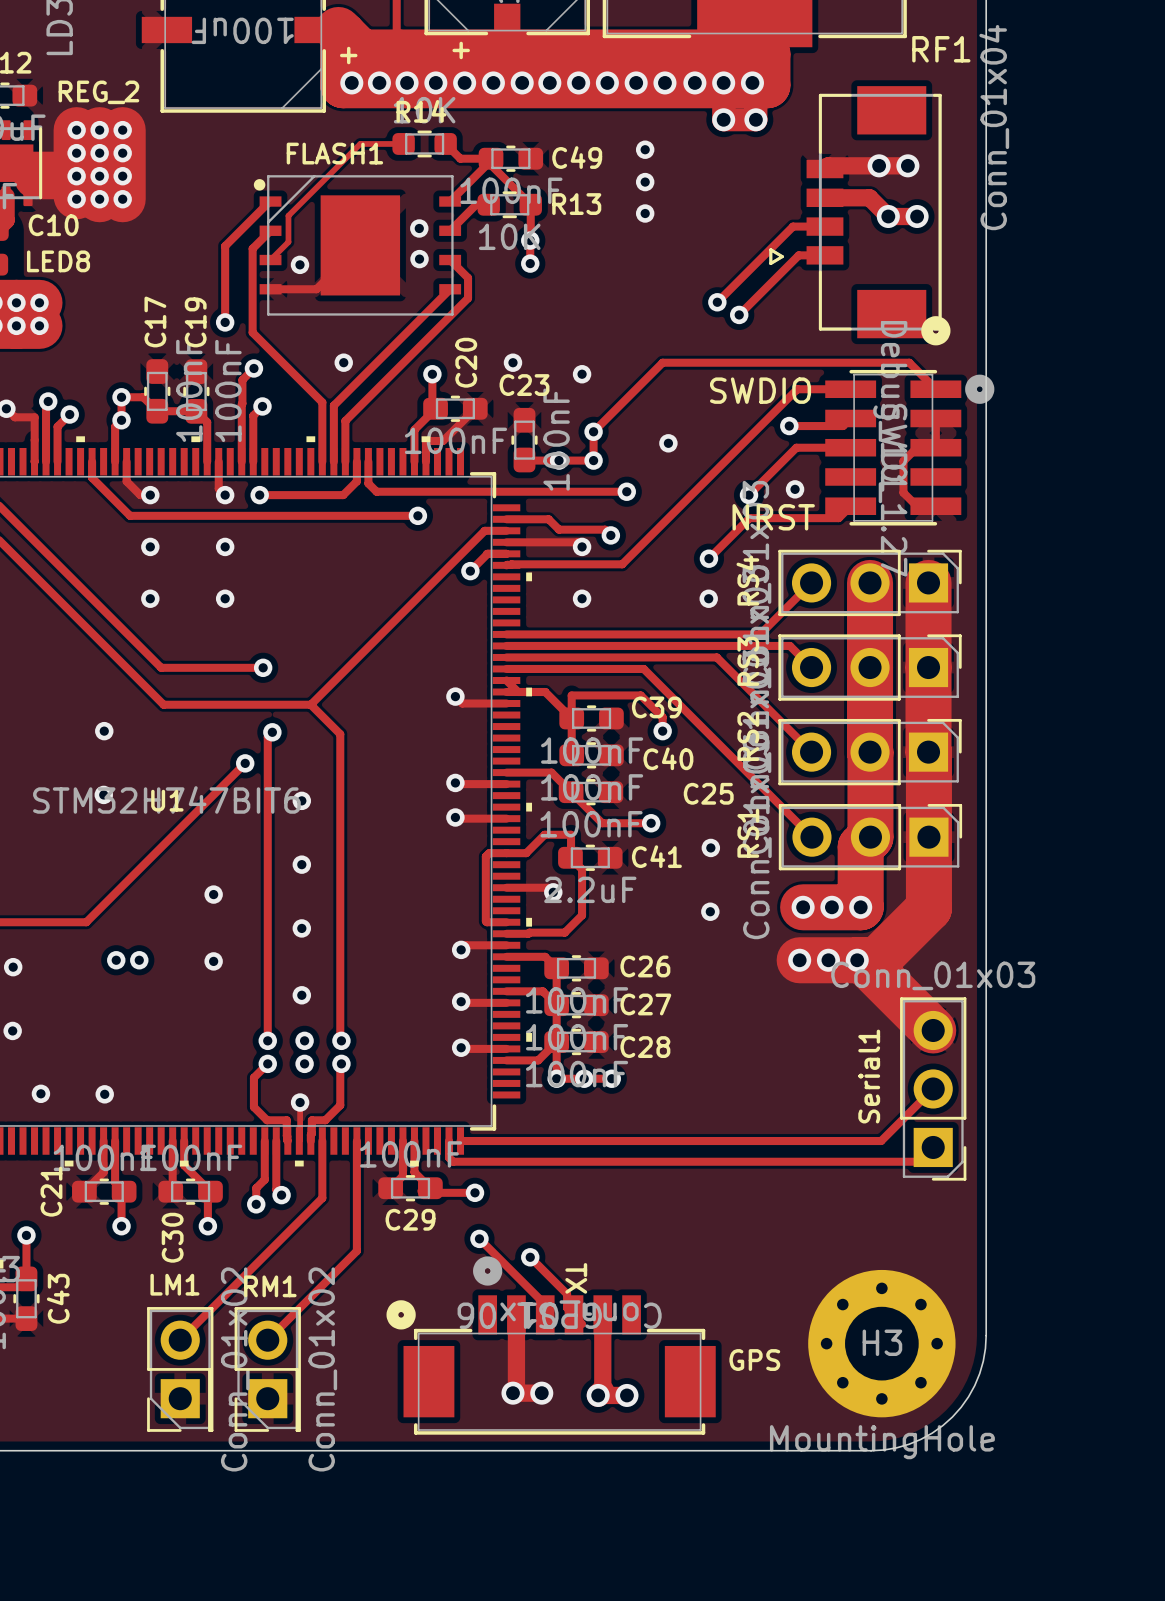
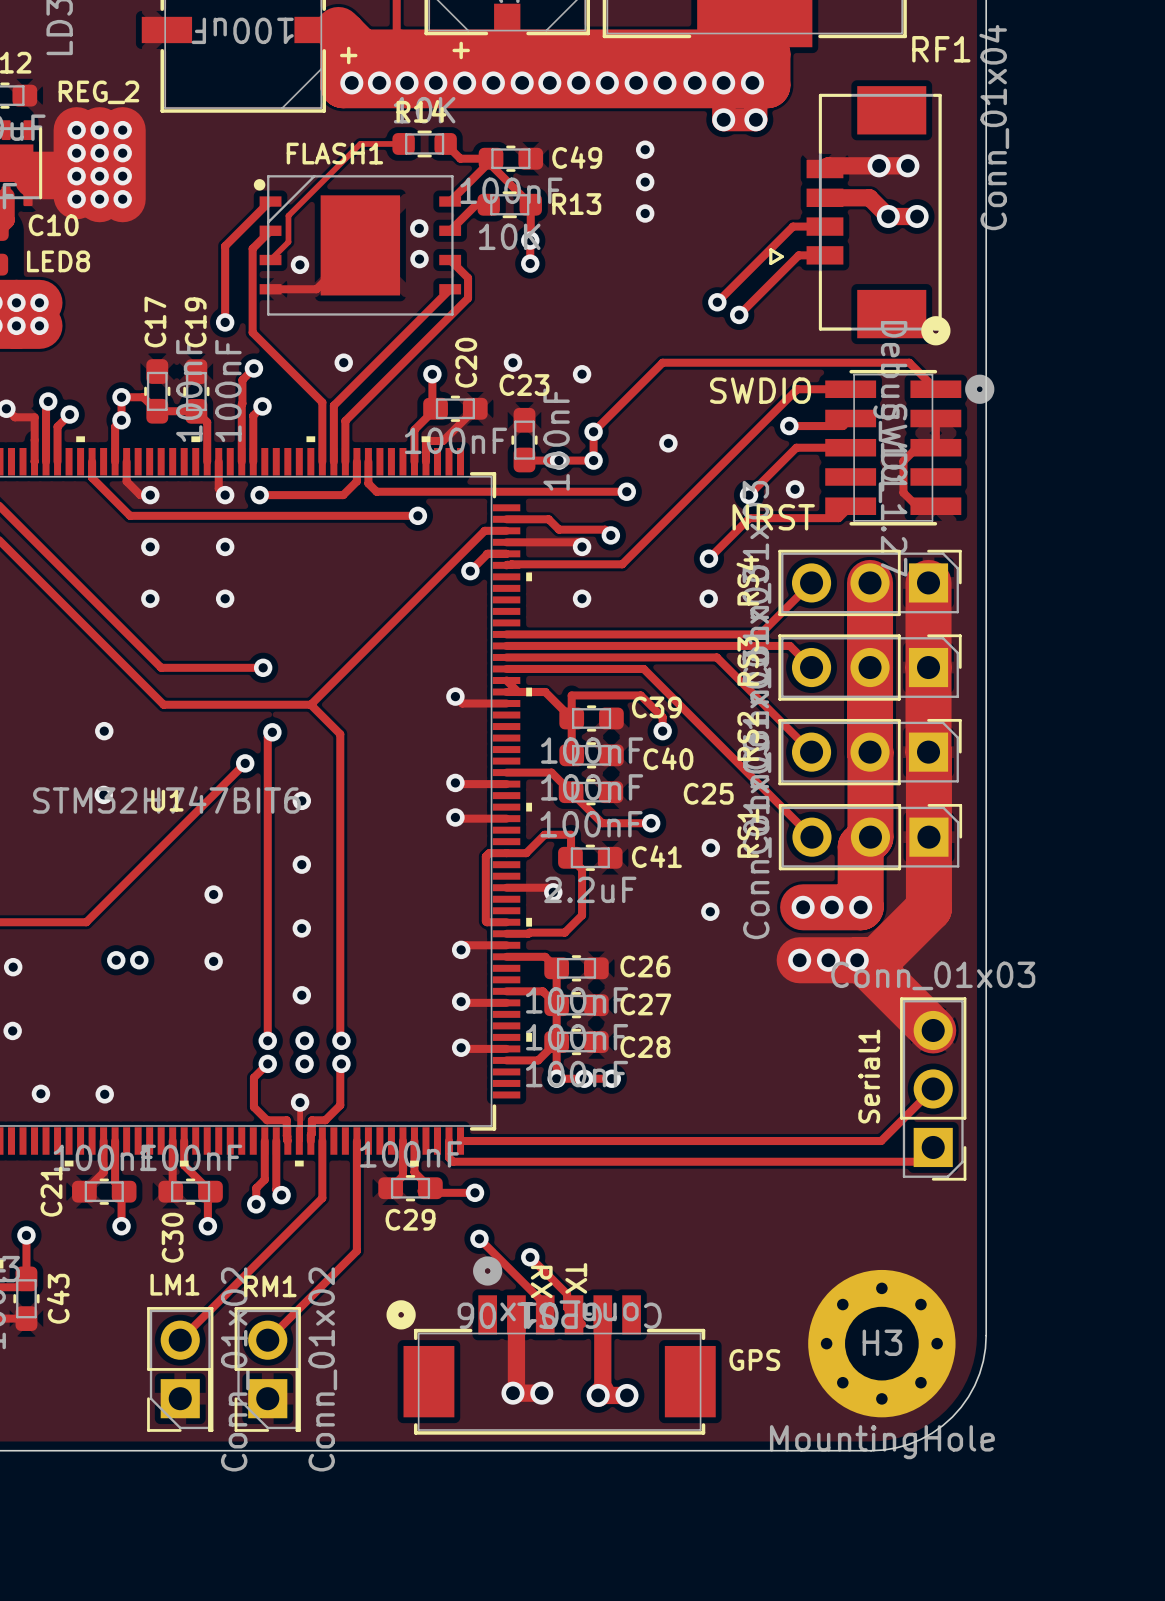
text: none -> RX (541, 1281)

